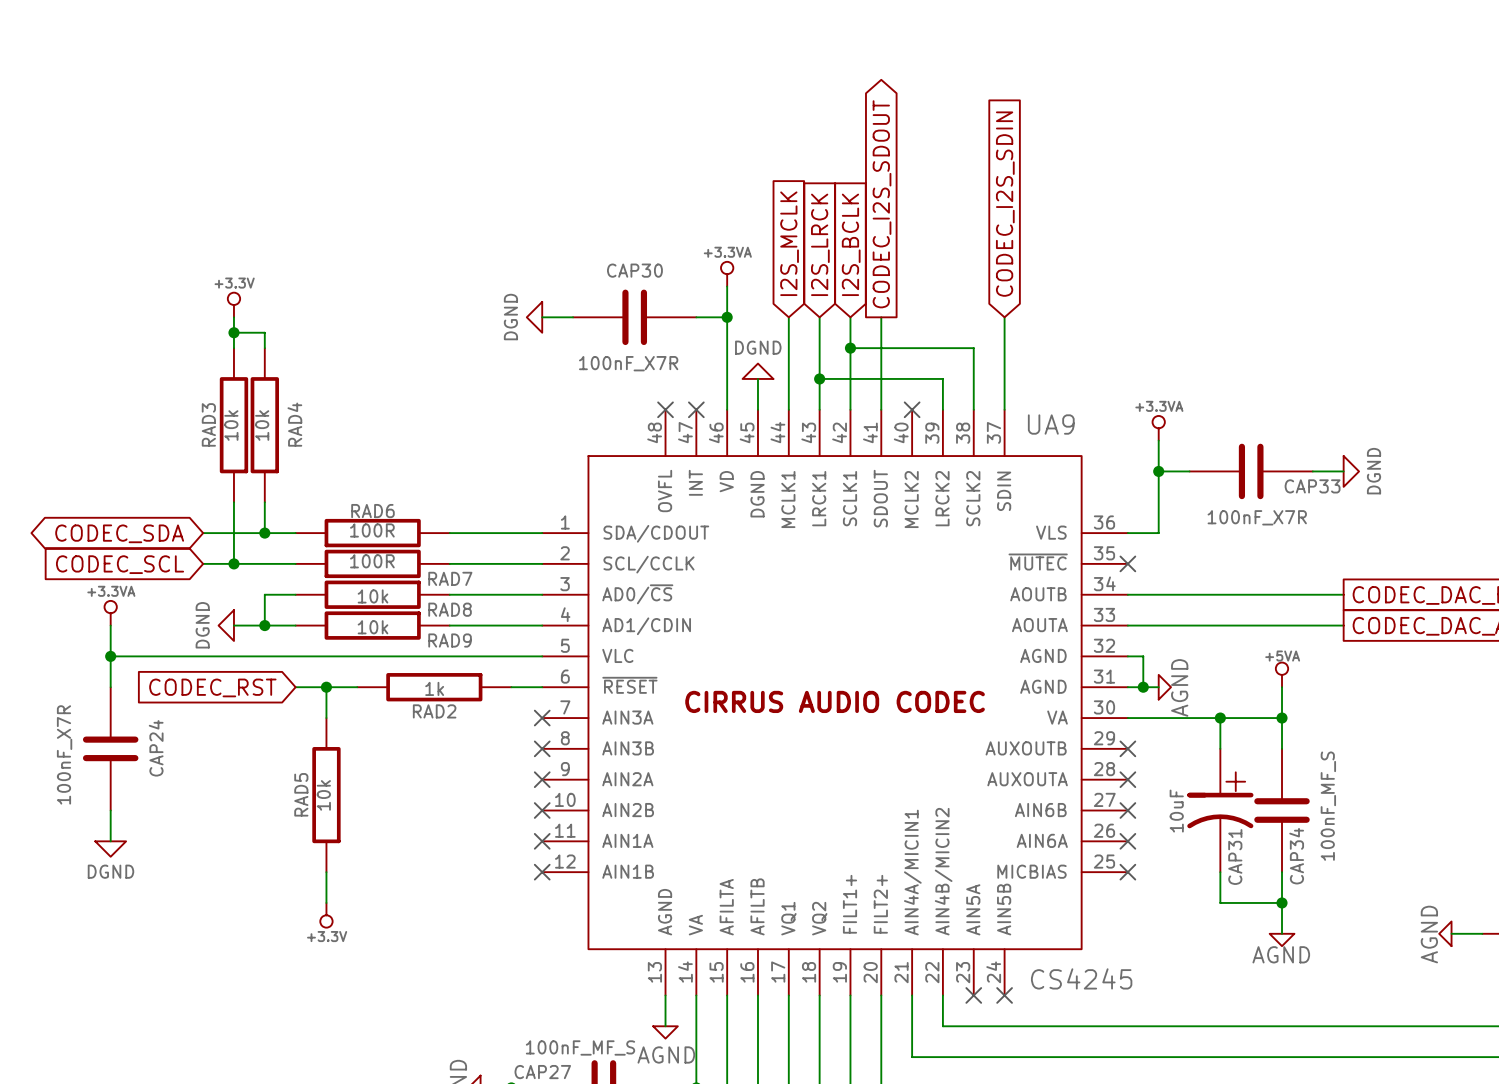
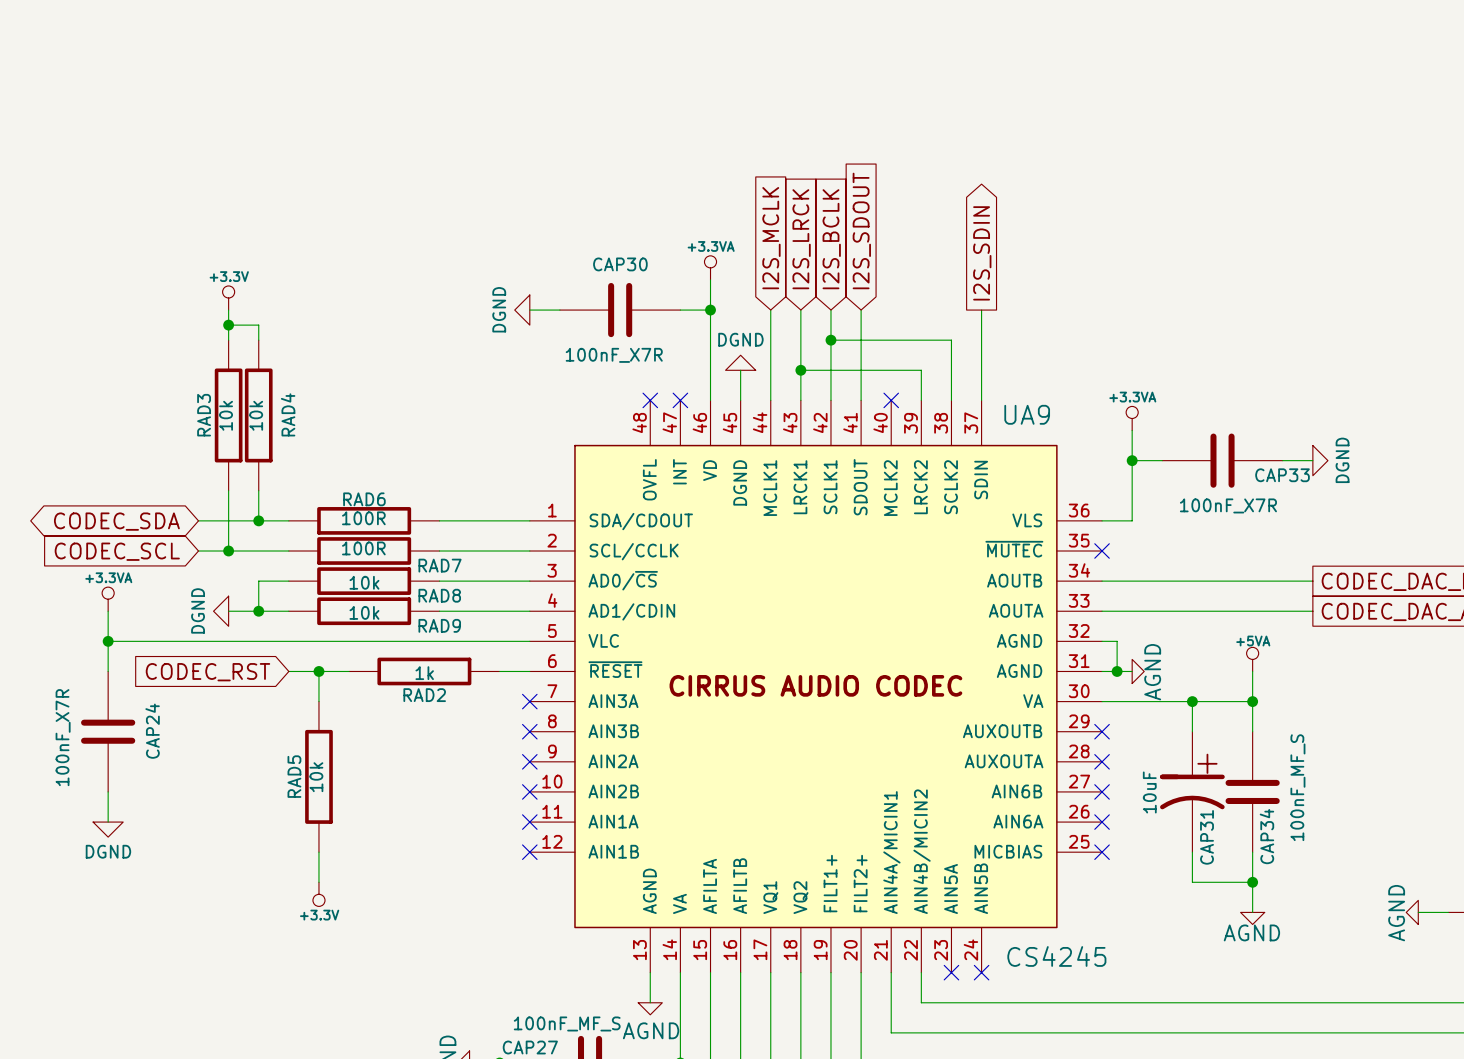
global label shape: output (882, 204) -> input (861, 230)
global label: CODEC_I2S_SDOUT (882, 204) -> I2S_SDOUT (861, 230)
global label shape: input (1005, 204) -> output (982, 253)
global label: CODEC_I2S_SDIN (1005, 204) -> I2S_SDIN (982, 253)

